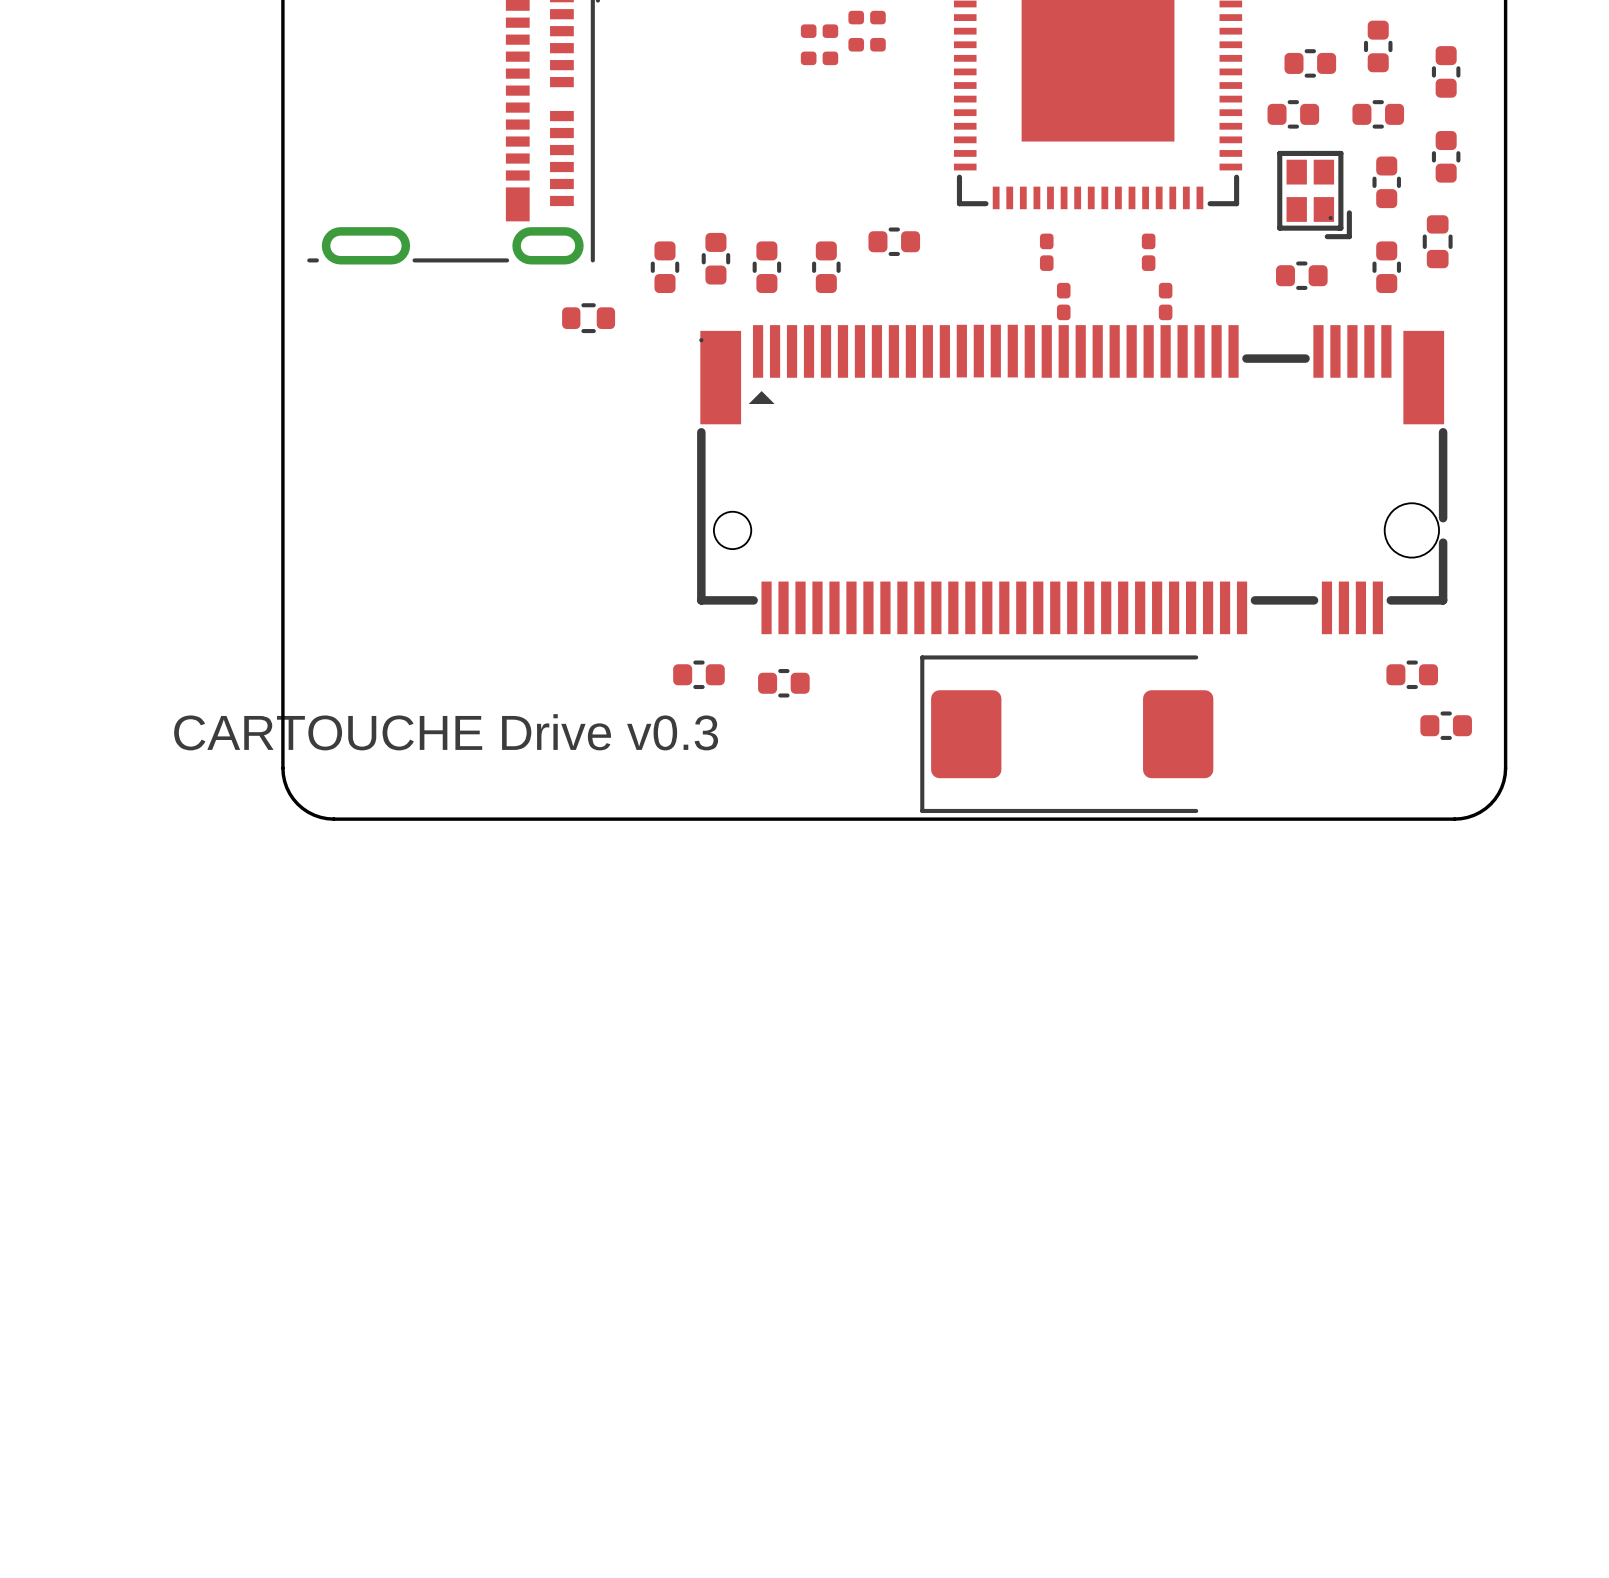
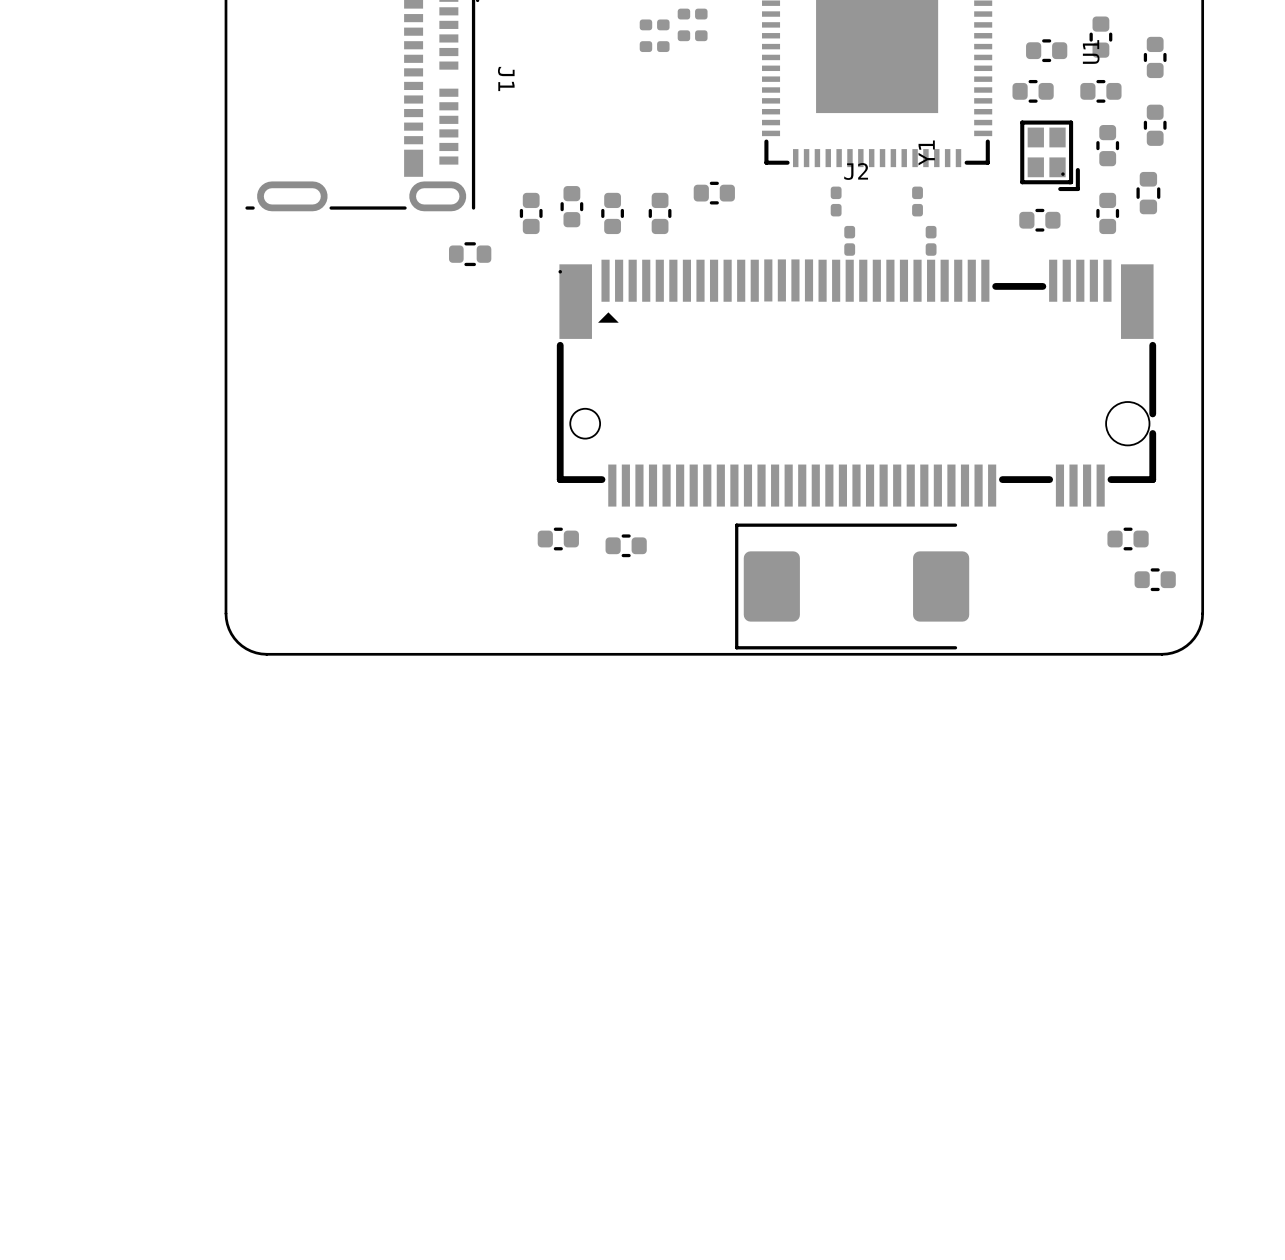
U1 name: none -> U1 (1091, 51)
J1 name: none -> J1 (506, 78)
Y1 name: none -> Y1 (926, 152)
J2 name: none -> J2 (856, 171)
text: CARTOUCHE Drive v0.3 (446, 732) -> none

